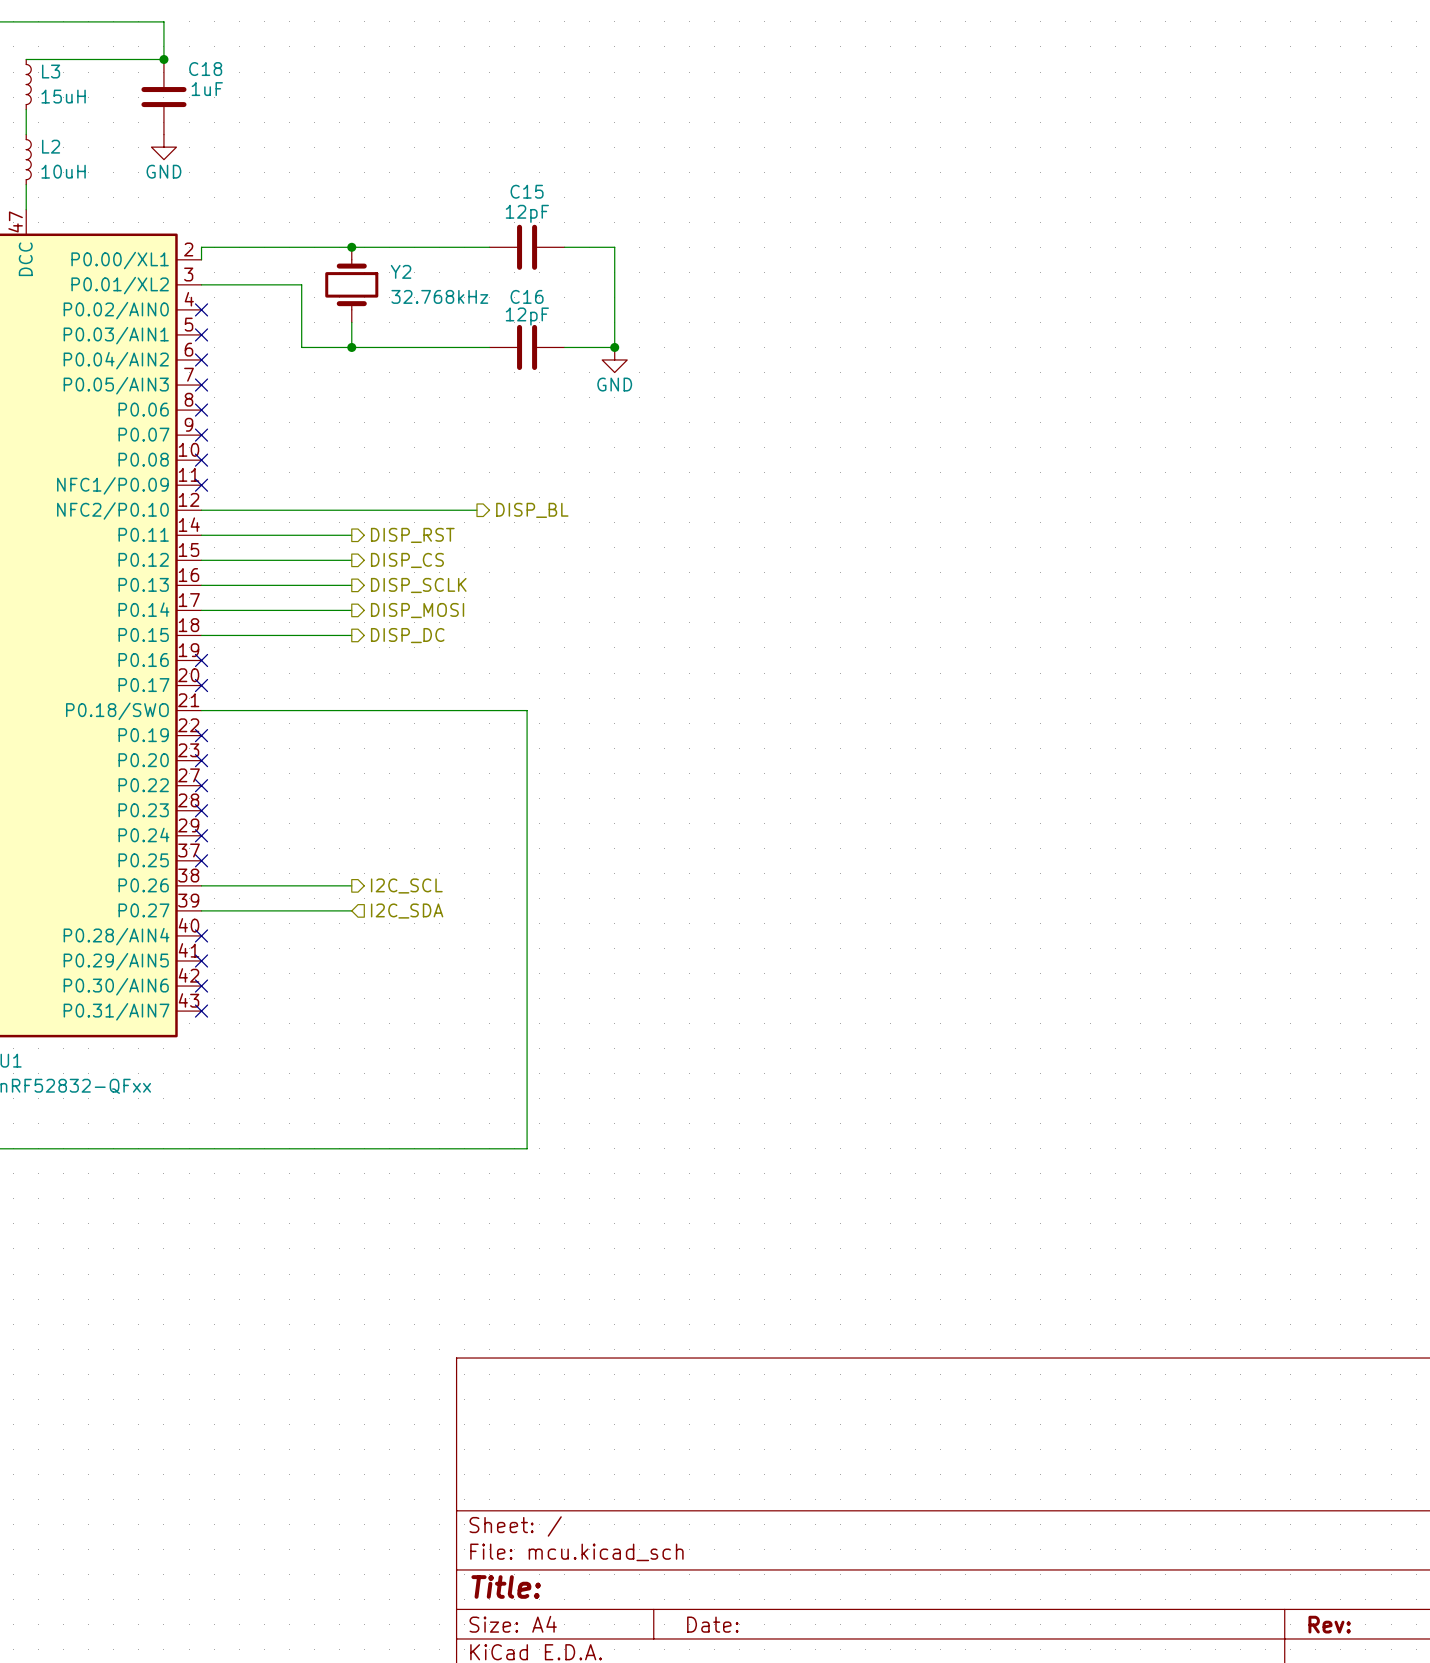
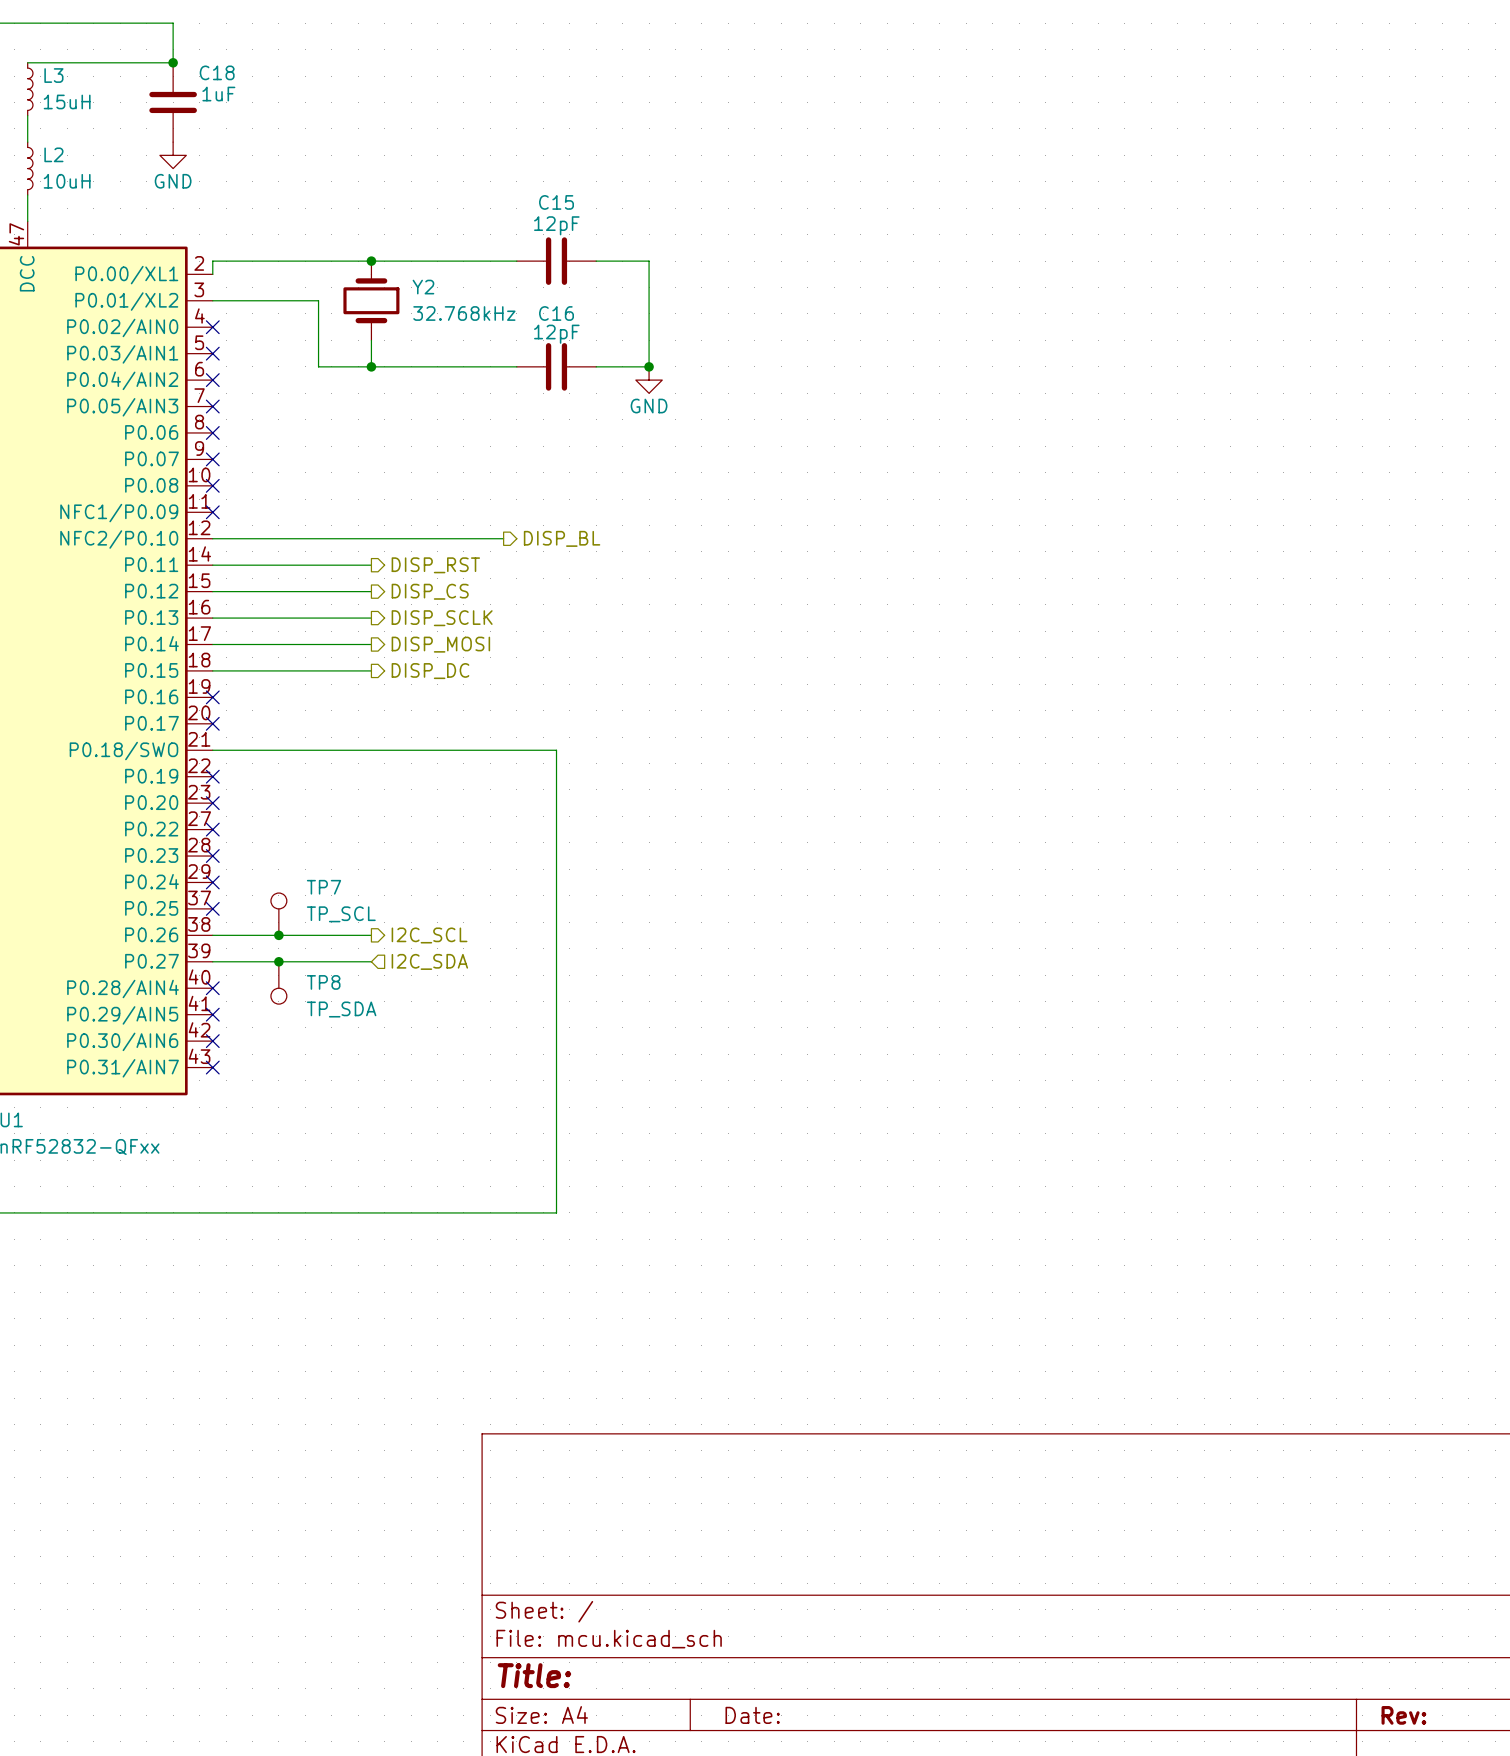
TP7: none -> TP_SCL (278, 914)
junction: none -> (278, 935)
junction: none -> (278, 961)
TP8: none -> TP_SDA (278, 982)

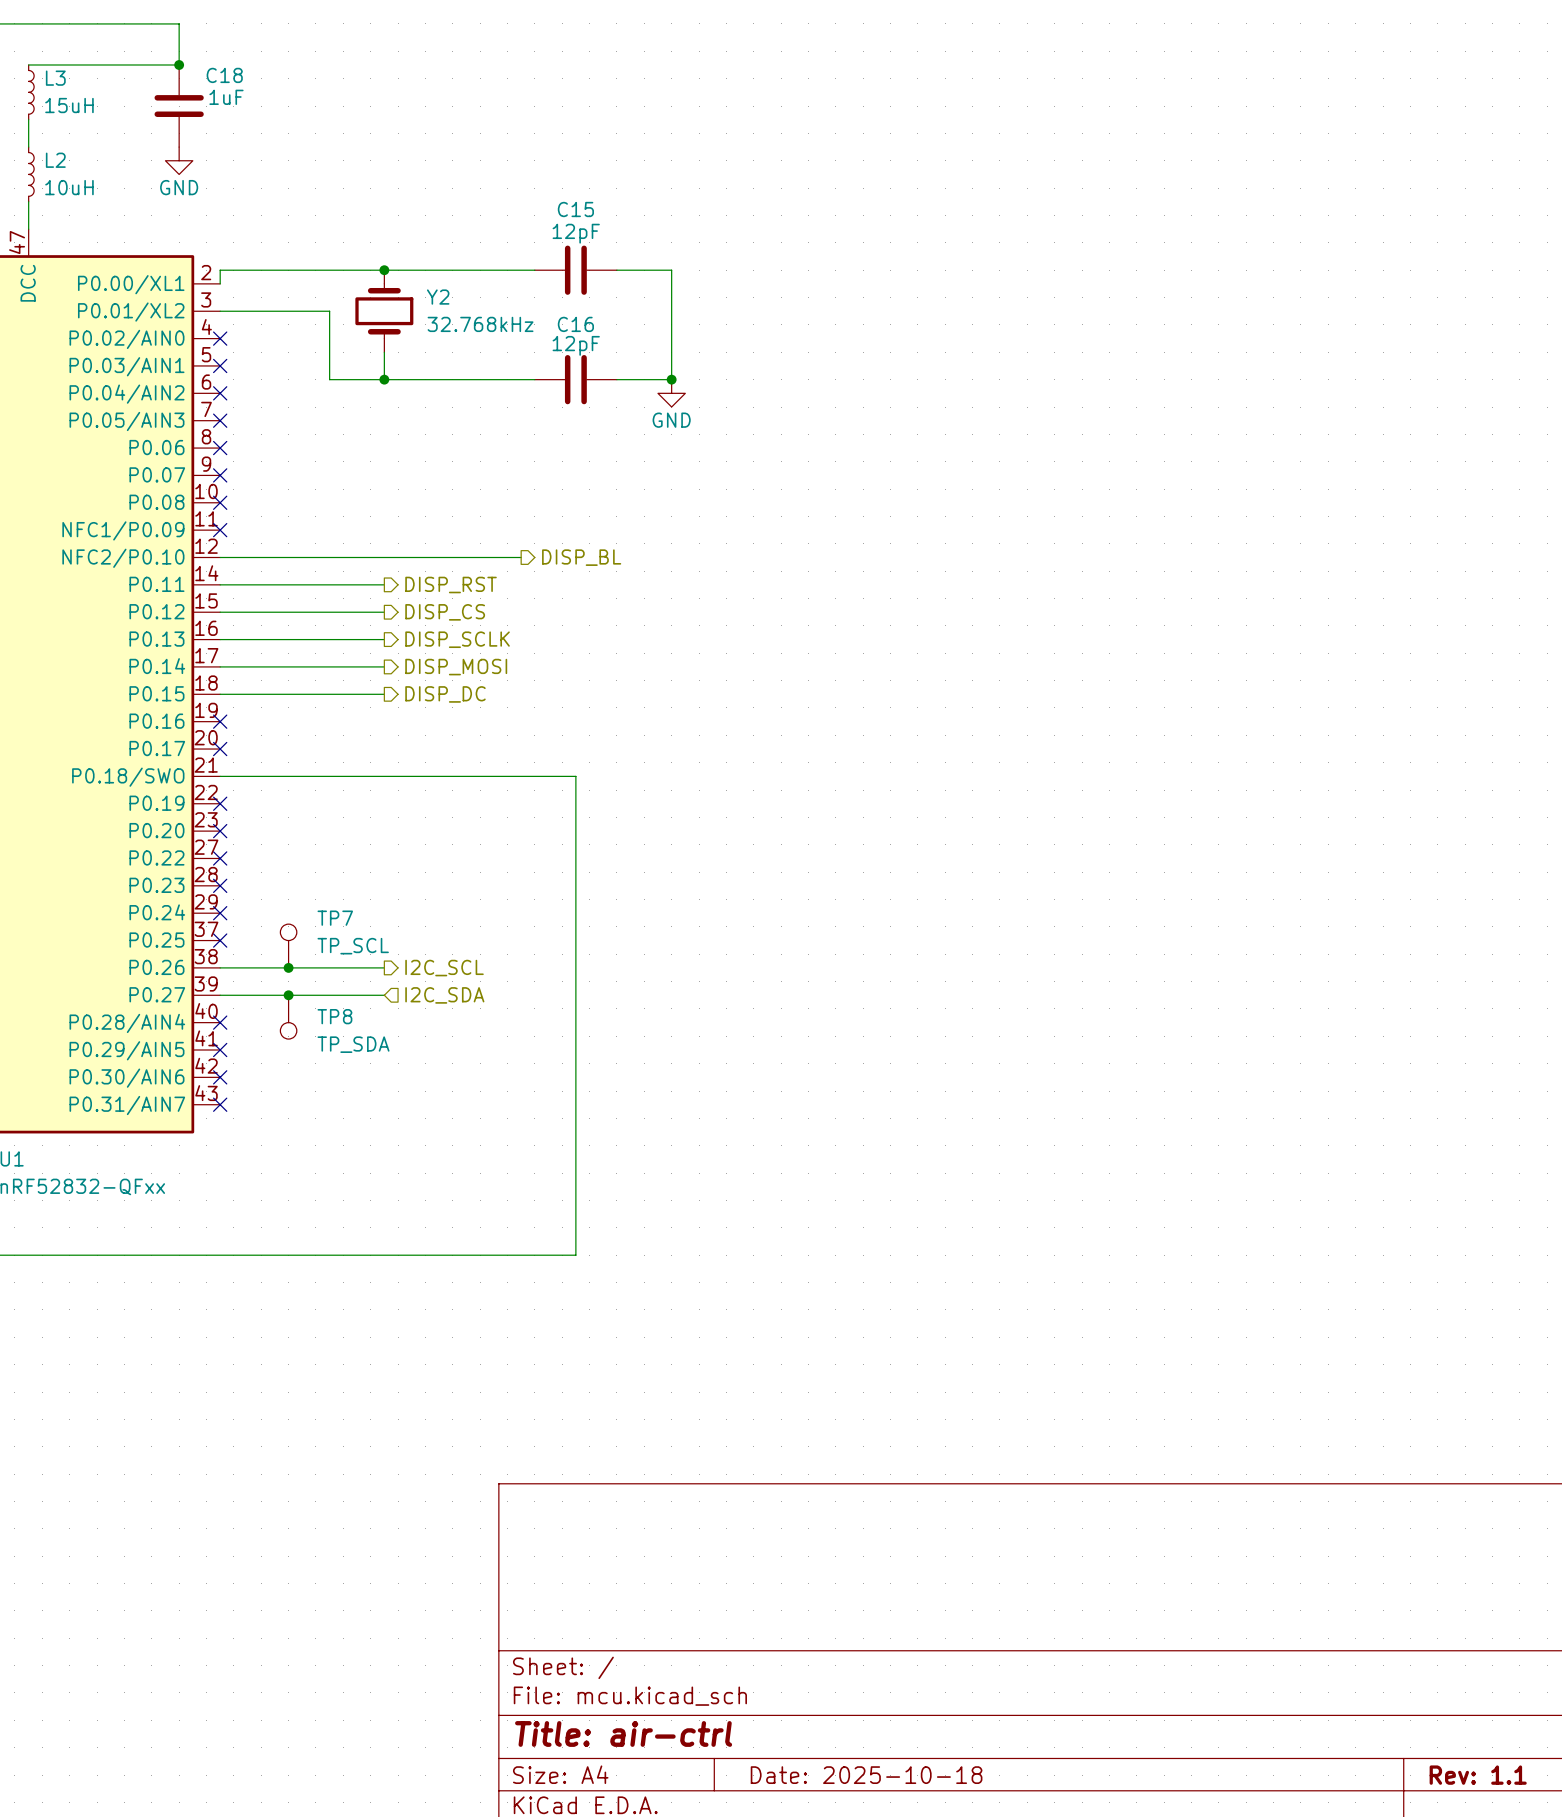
title block: Title: (534, 1675) -> Title: air-ctrl (623, 1733)
title block: Date: (752, 1715) -> Date: 2025-10-18 (866, 1775)
title block: Rev: (1403, 1715) -> Rev: 1.1 (1478, 1775)

